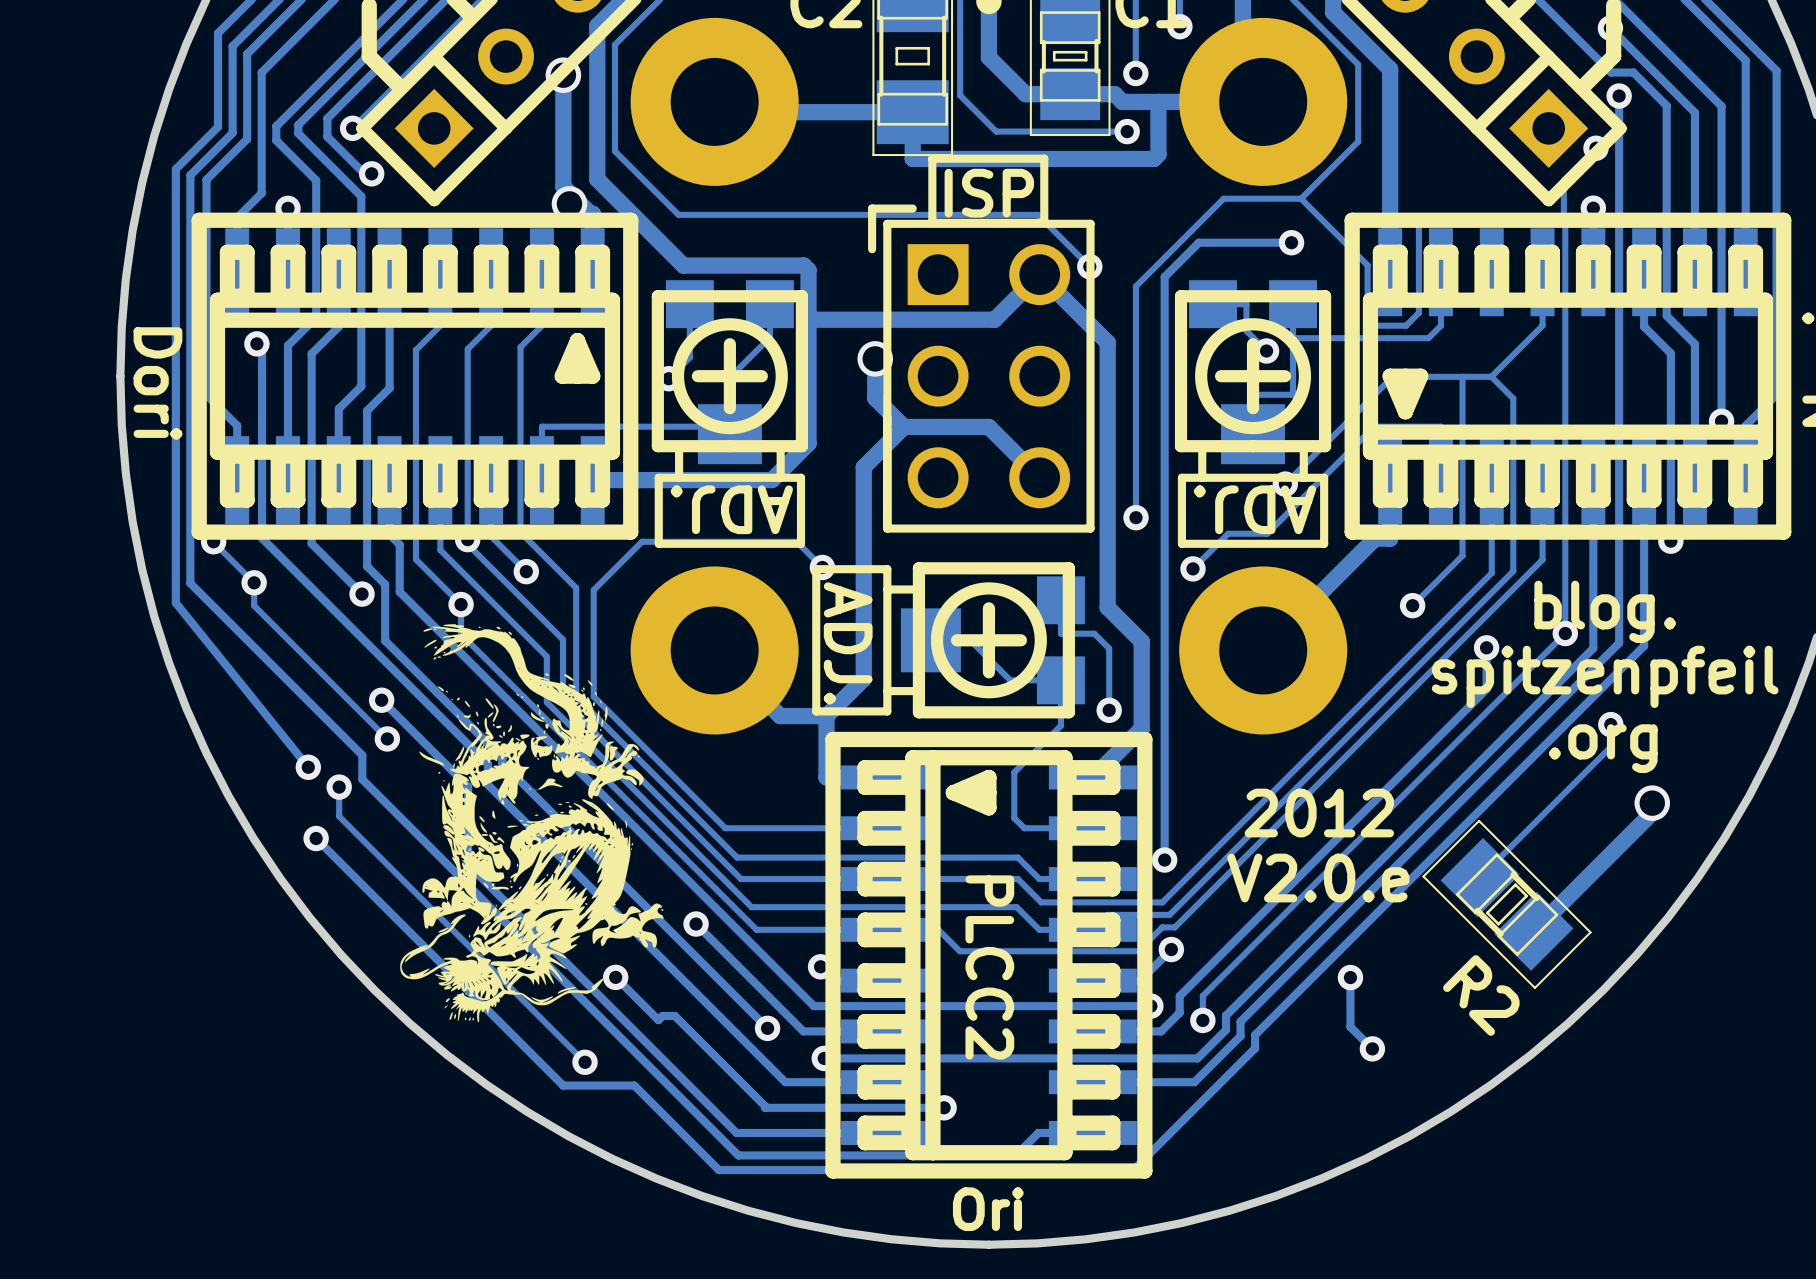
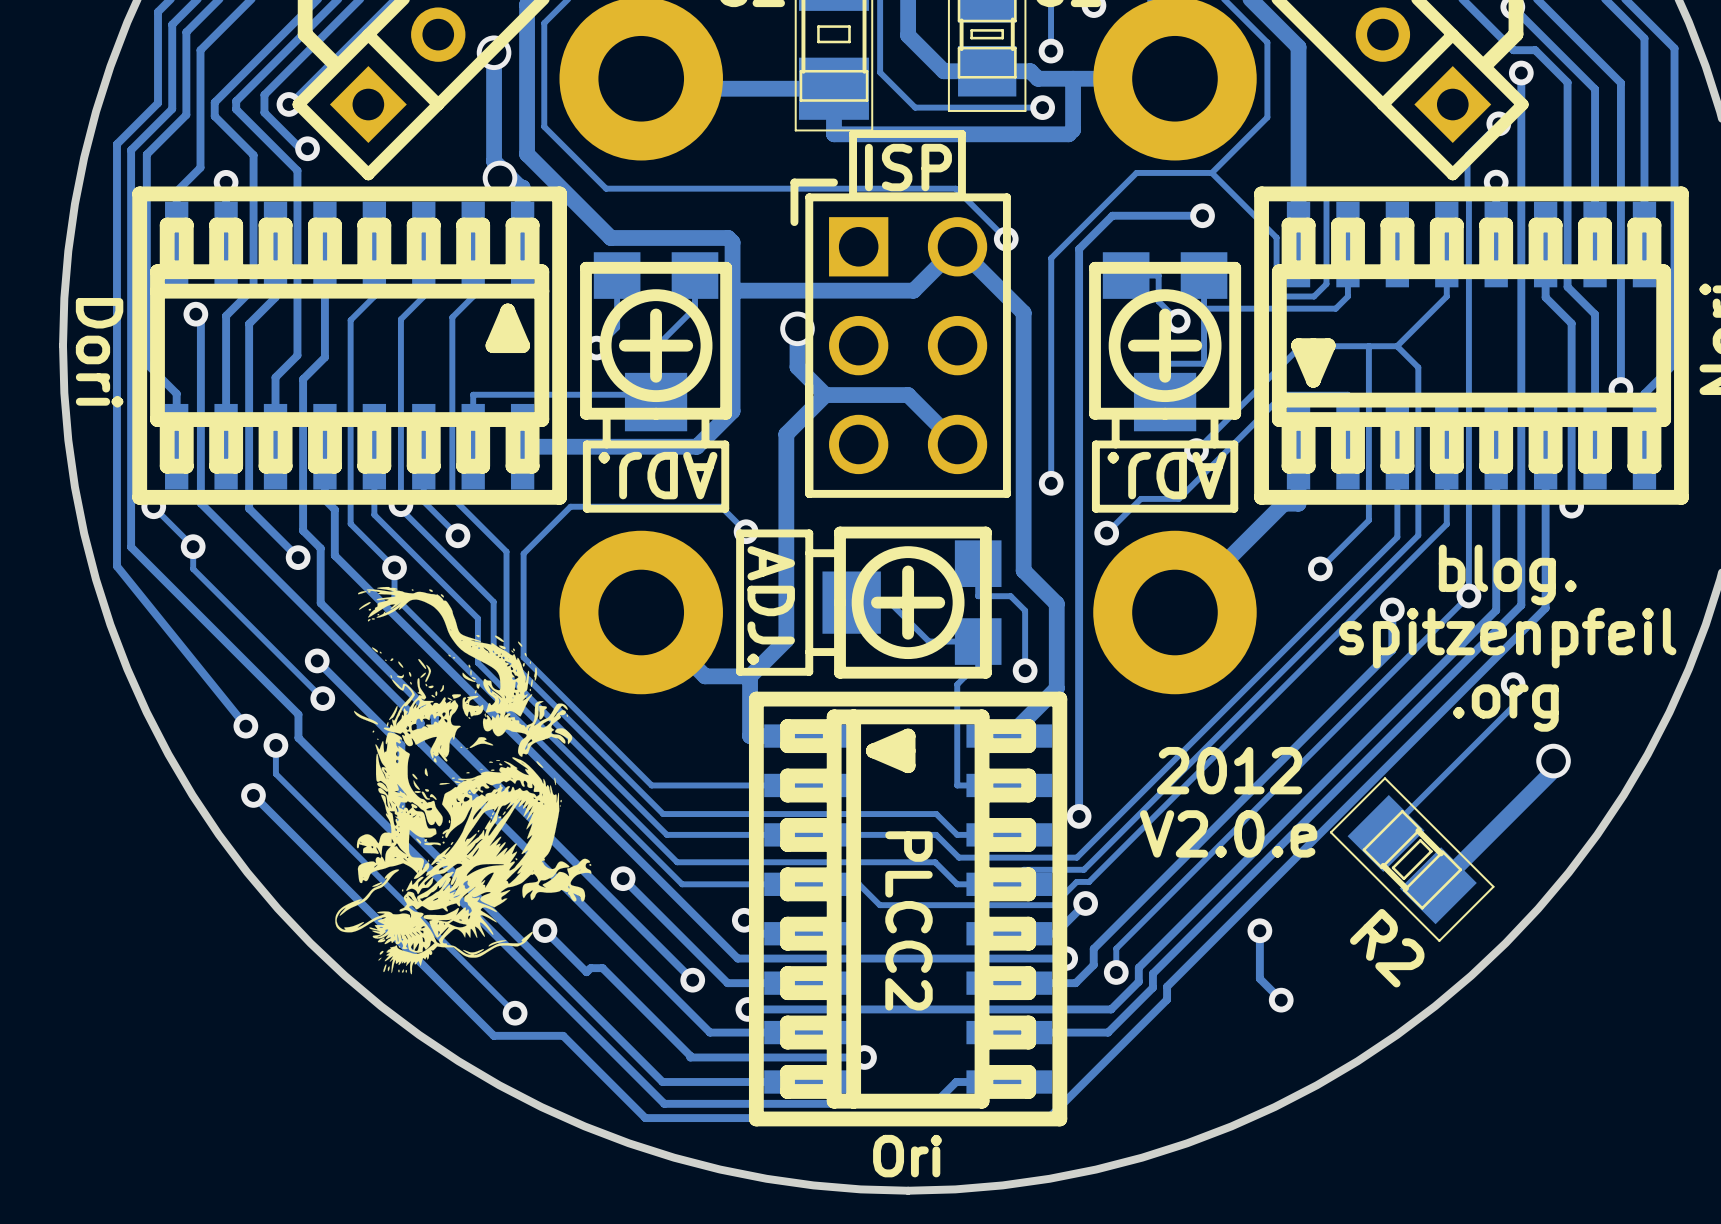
track: (1060, 713) (1060, 725) (1014, 772) (1014, 818) (1024, 828) (1039, 828) -> (978, 674) (967, 674) (957, 684) (957, 785)

